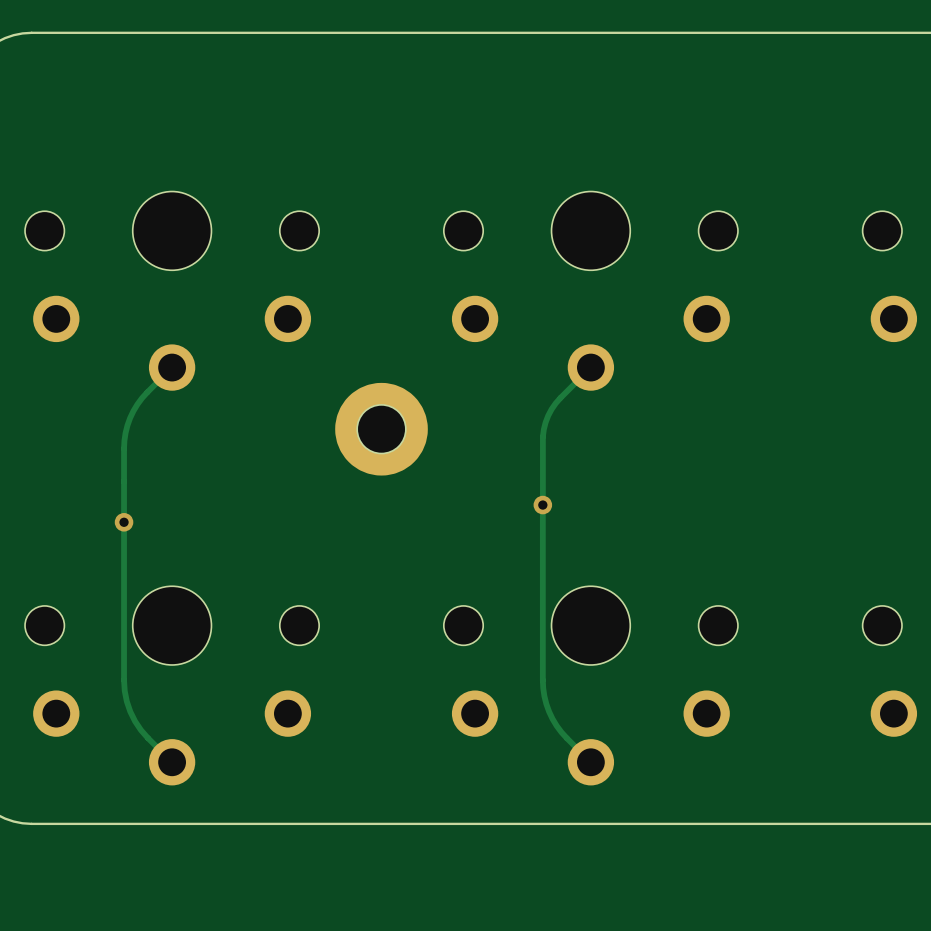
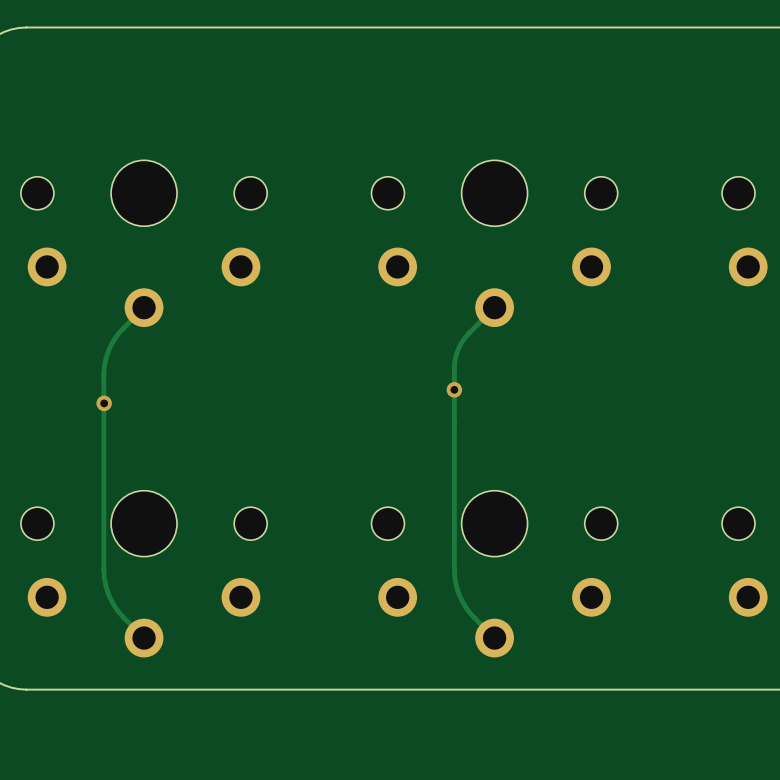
part: (381, 429) -> none
via position: (542, 505) -> (454, 389)
via position: (124, 522) -> (104, 403)

